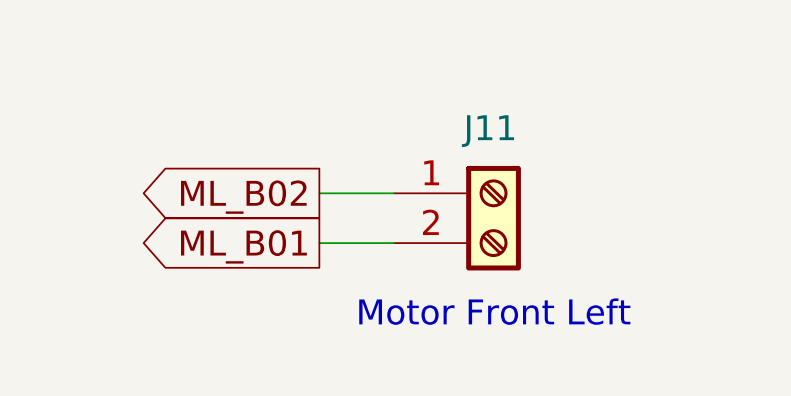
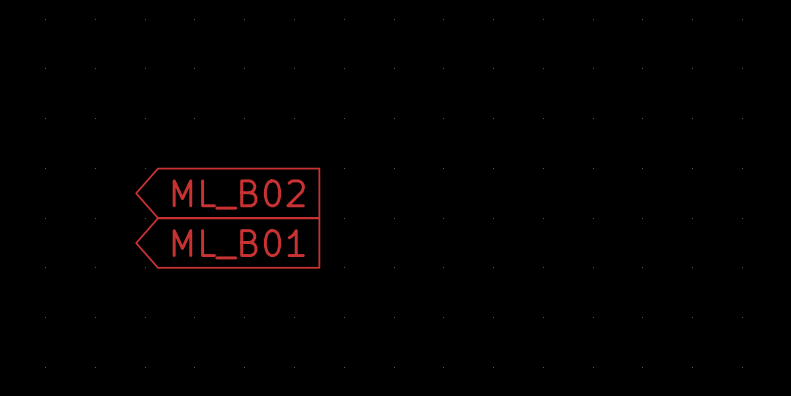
wire: (319, 193) (394, 193) -> none
J11: (457, 218) -> none
wire: (319, 243) (394, 243) -> none
text: Motor Front Left (494, 311) -> none

